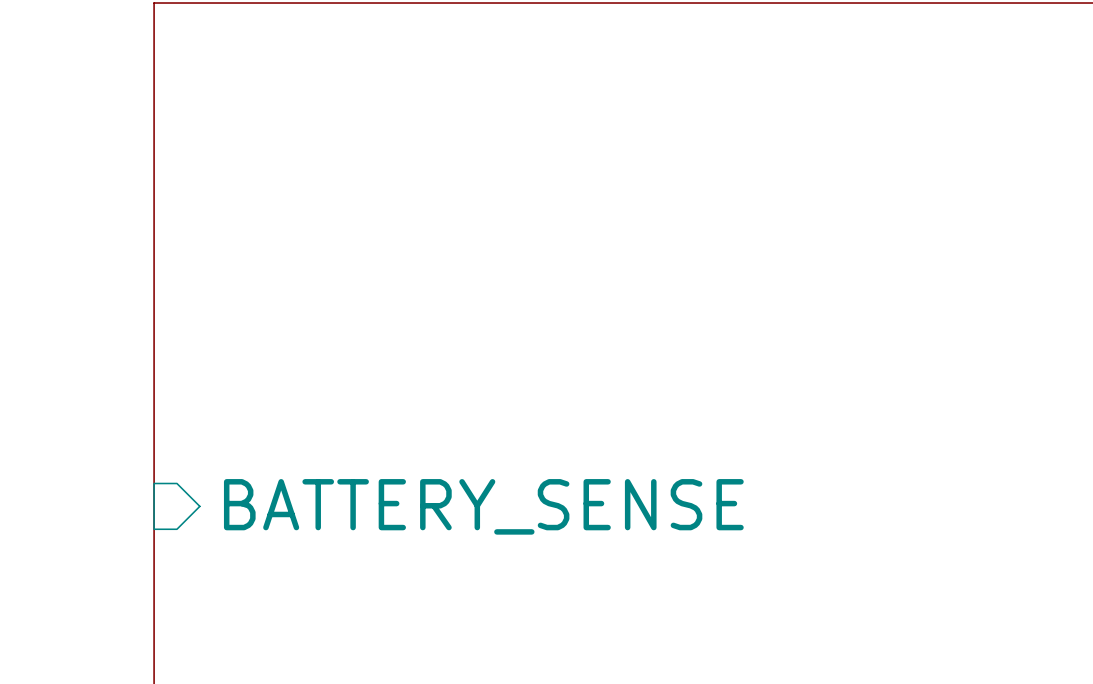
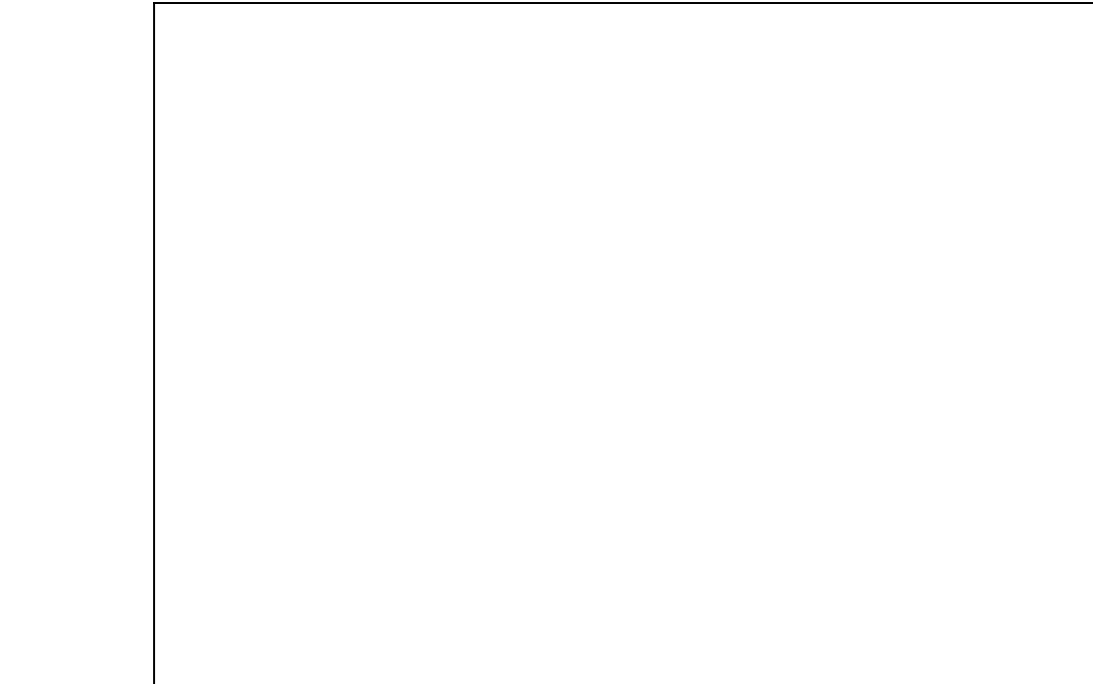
sheet pin: BATTERY_SENSE (483, 506) -> none

